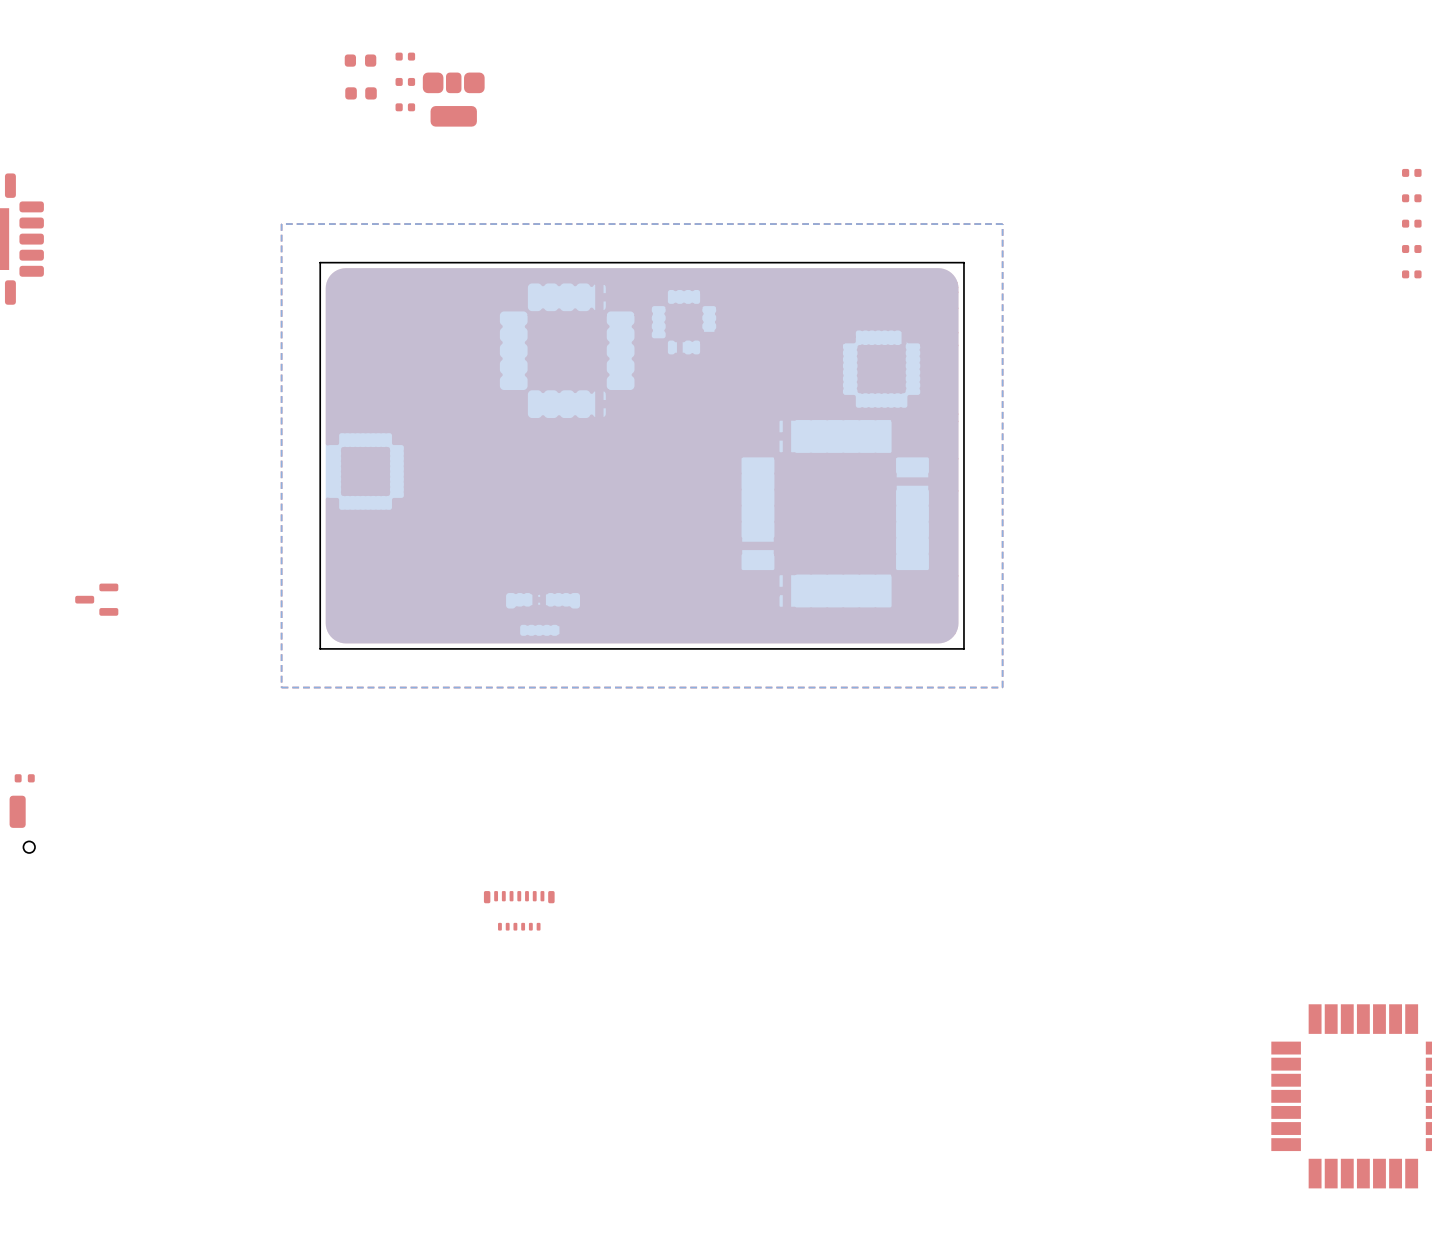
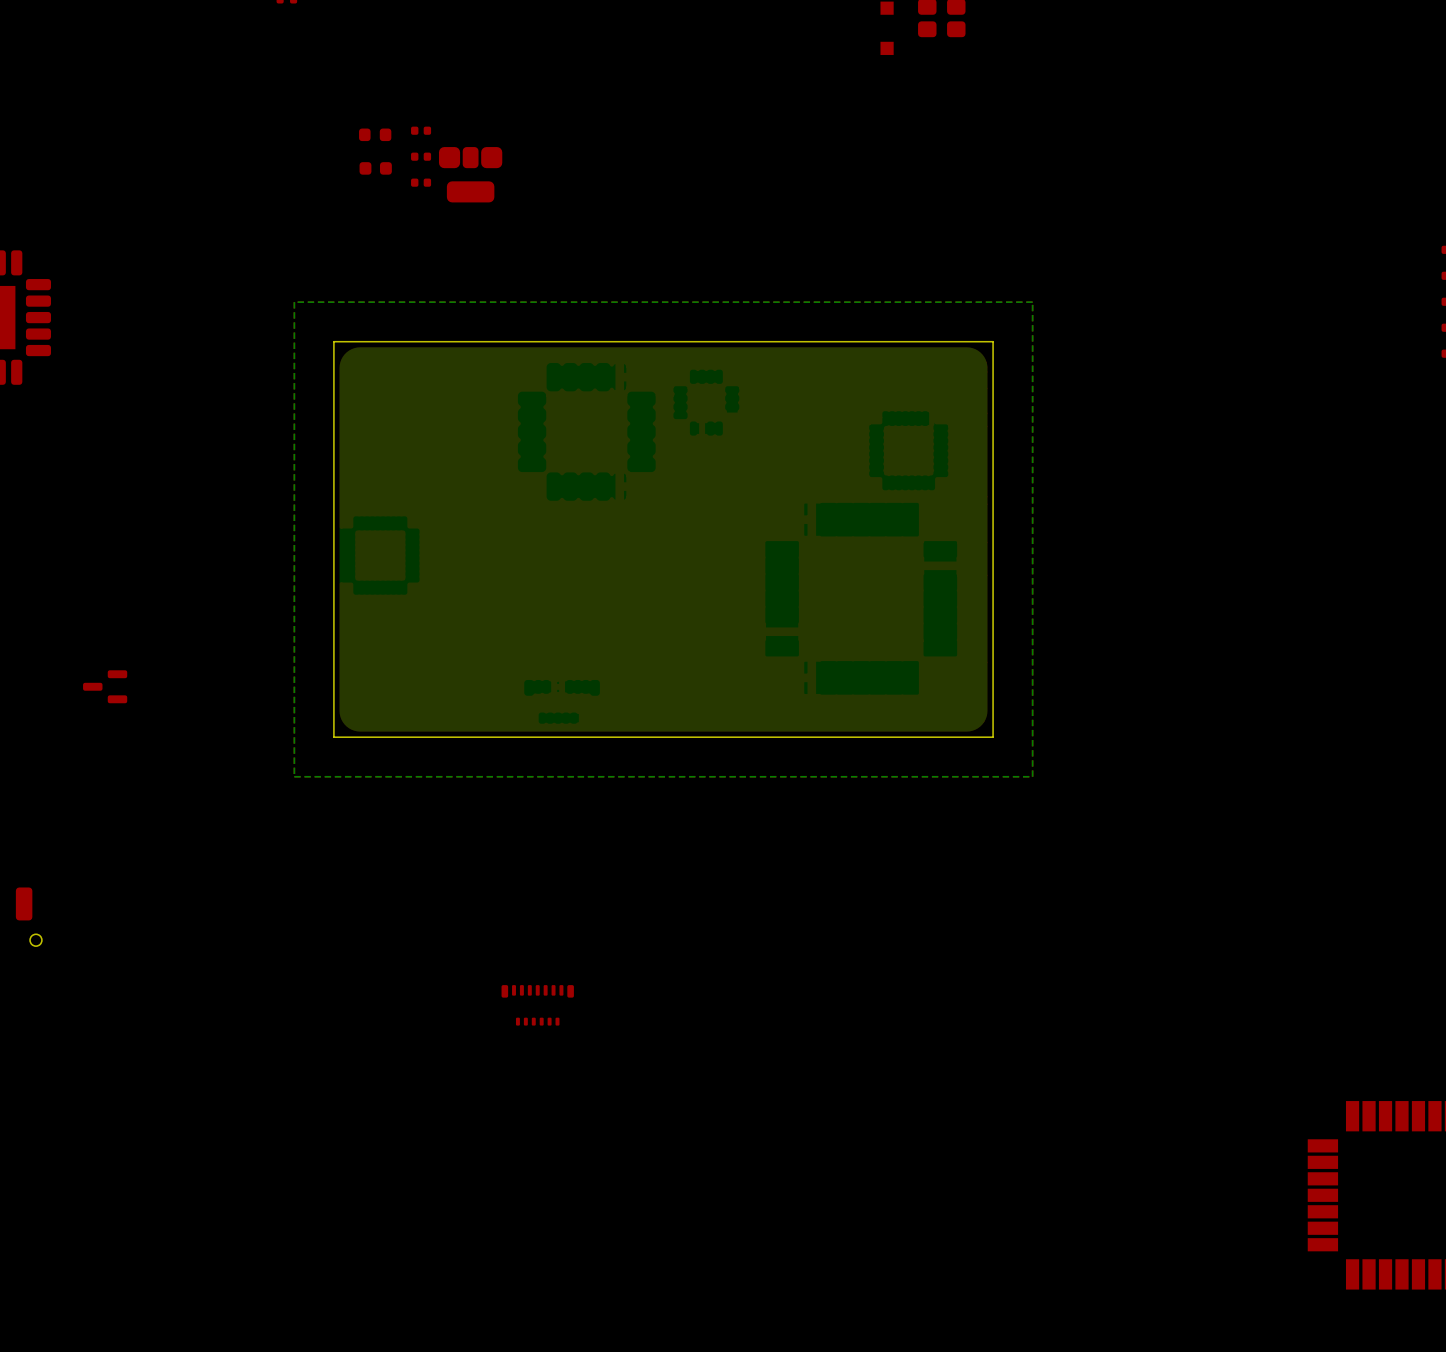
part: (24, 778) -> none

